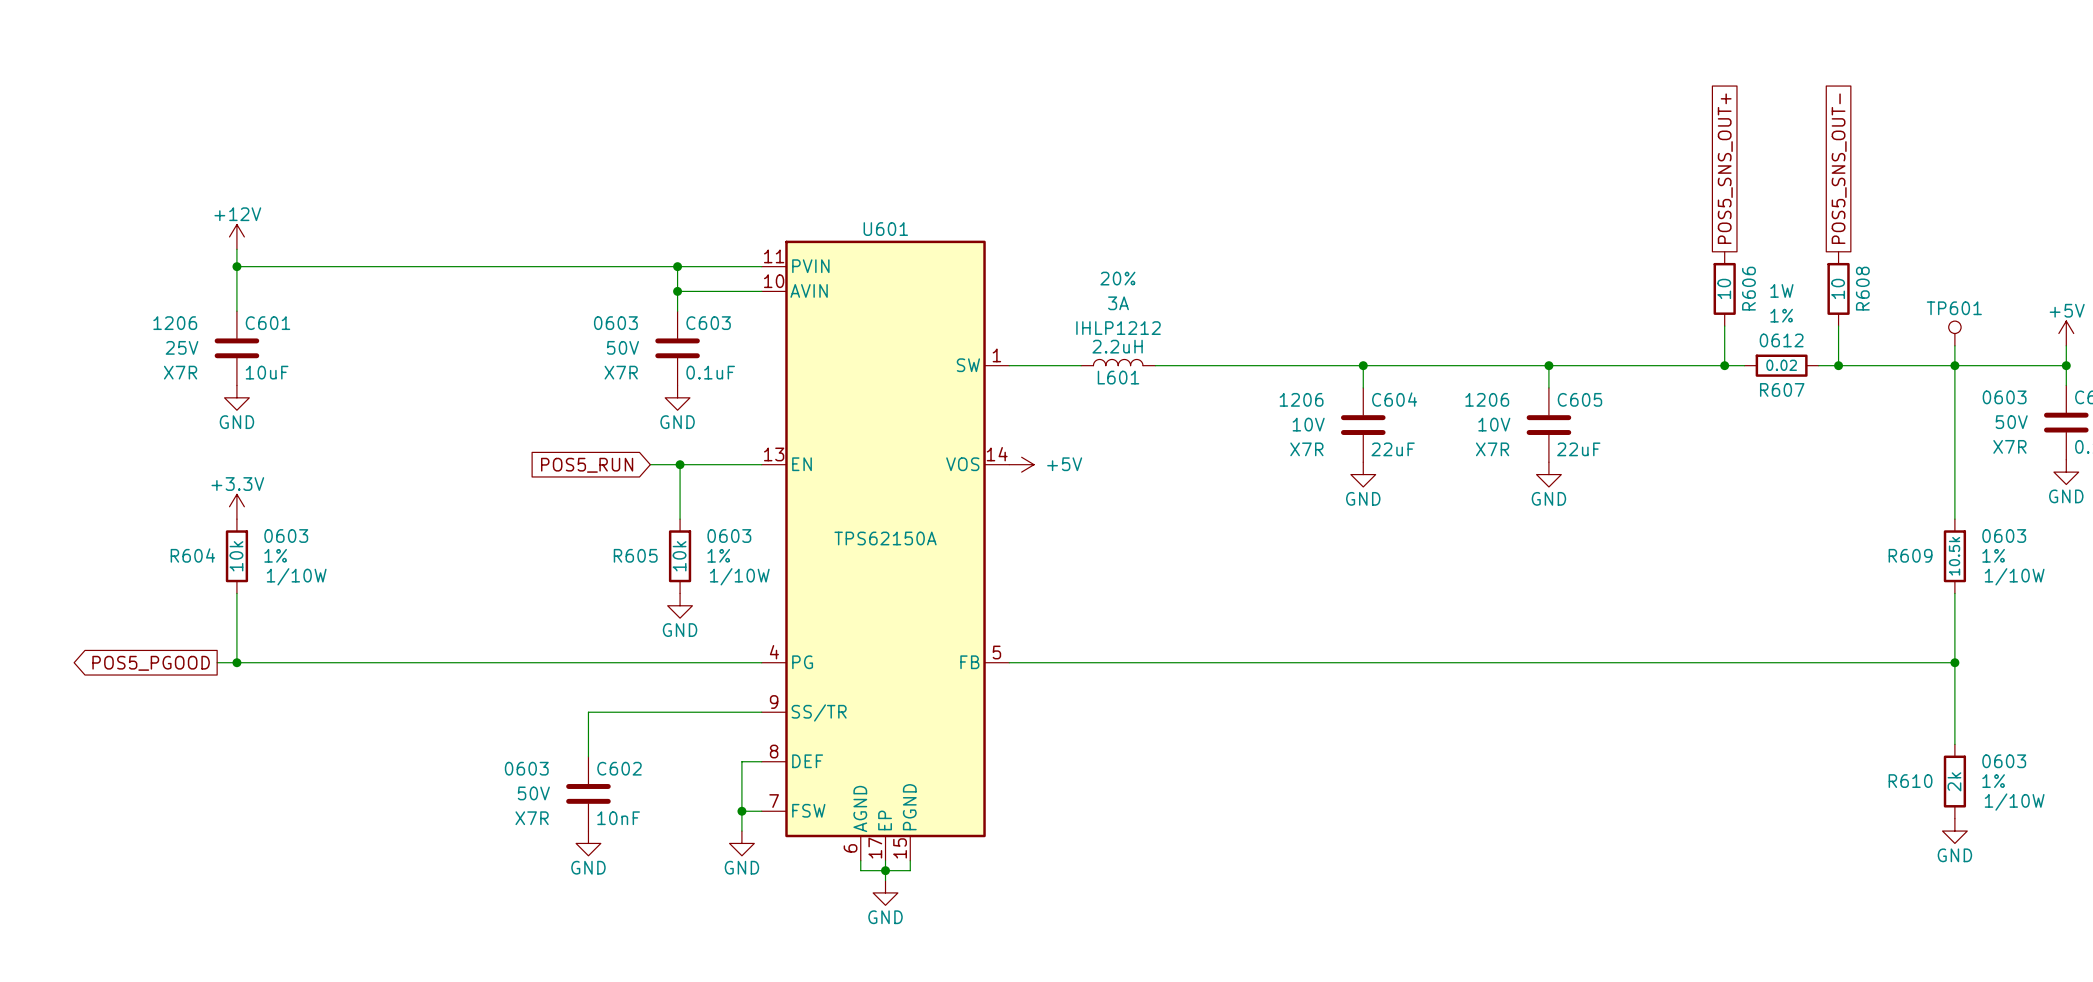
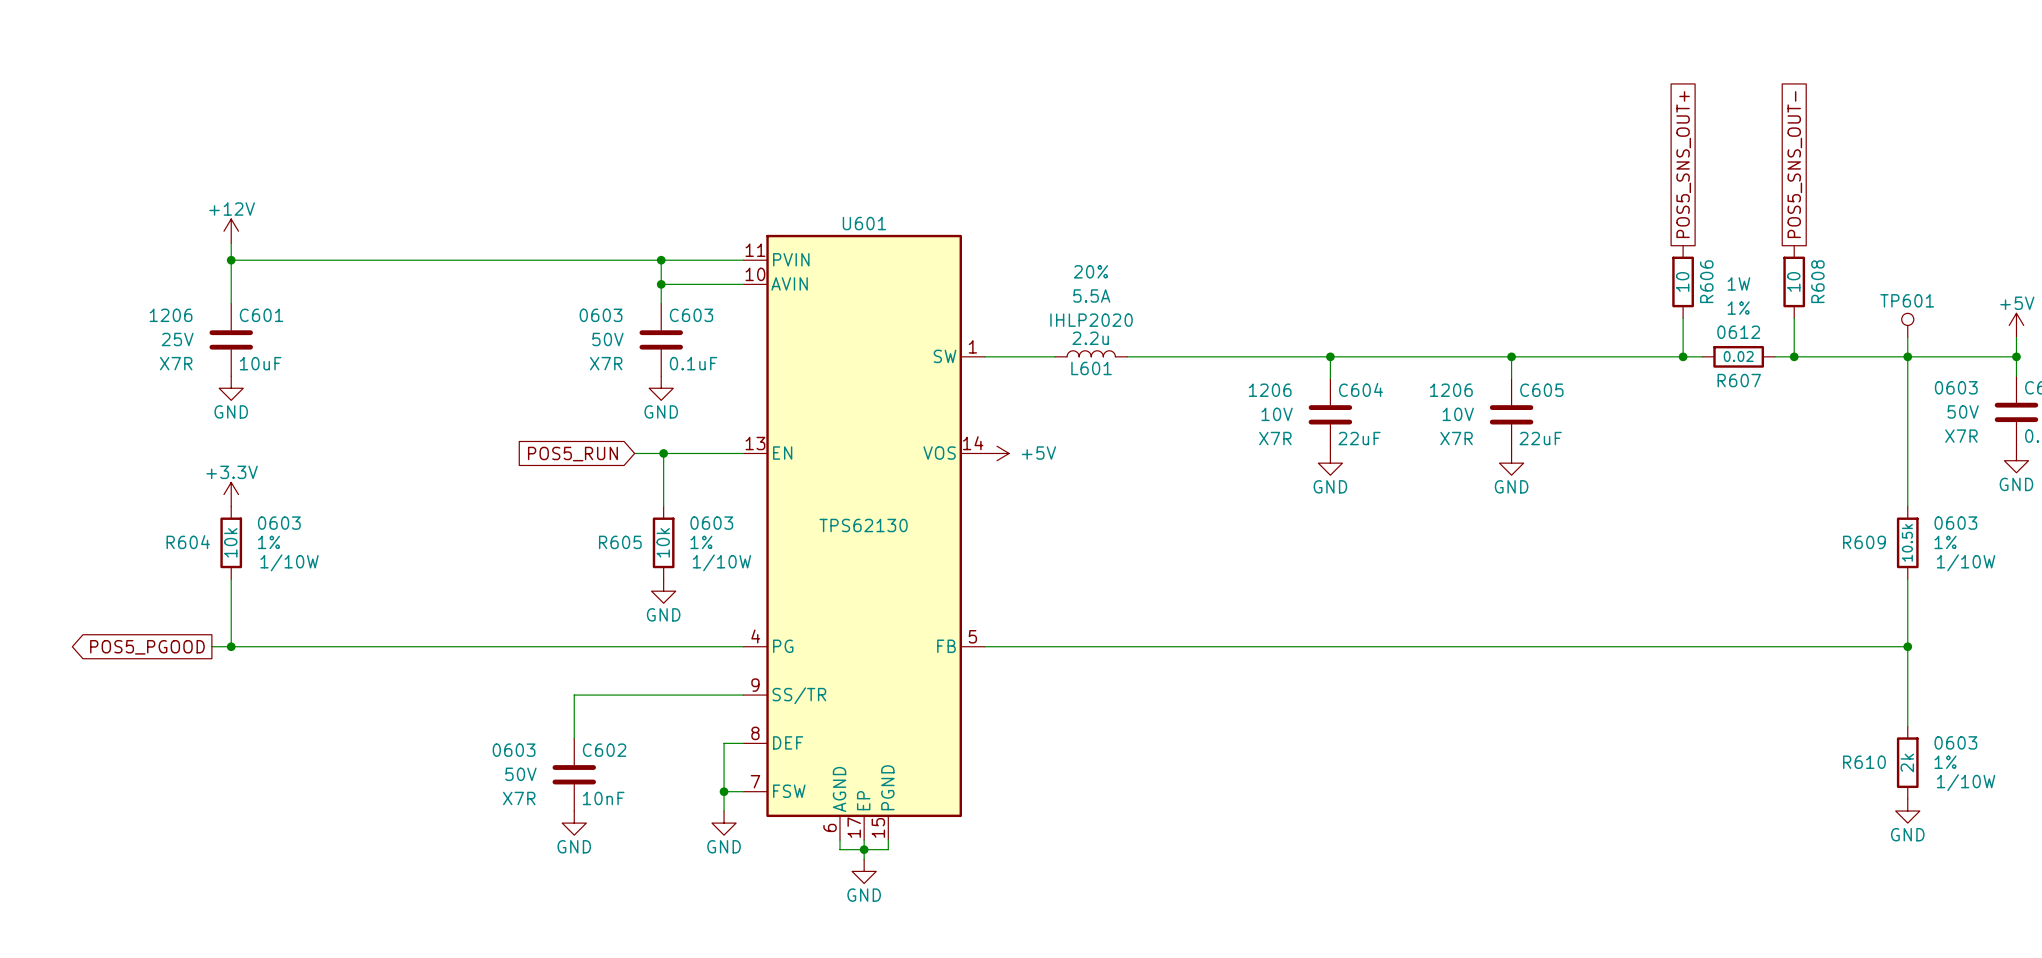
L601 text: 3A (1118, 303) -> 5.5A (1091, 296)
L601 text: IHLP1212 (1118, 328) -> IHLP2020 (1091, 320)
L601 value: 2.2uH (1117, 346) -> 2.2u (1090, 338)
U601 value: TPS62150A (885, 538) -> TPS62130 (863, 525)

